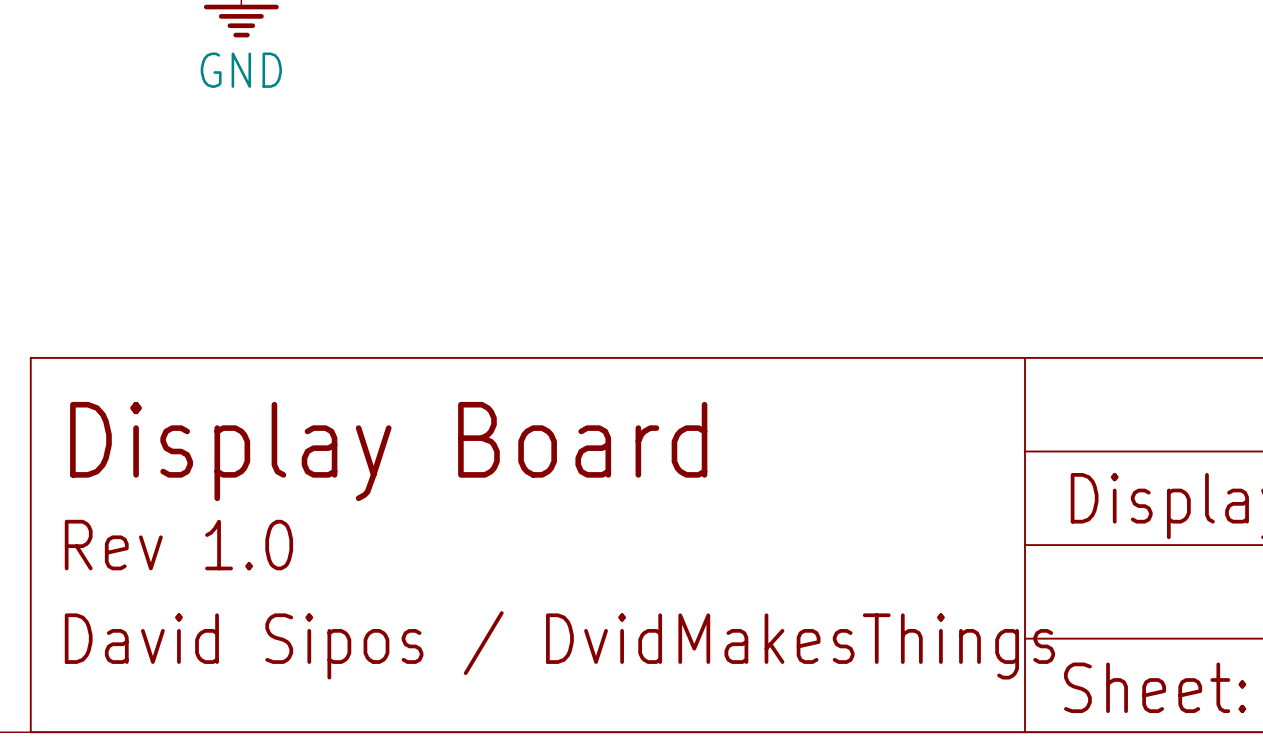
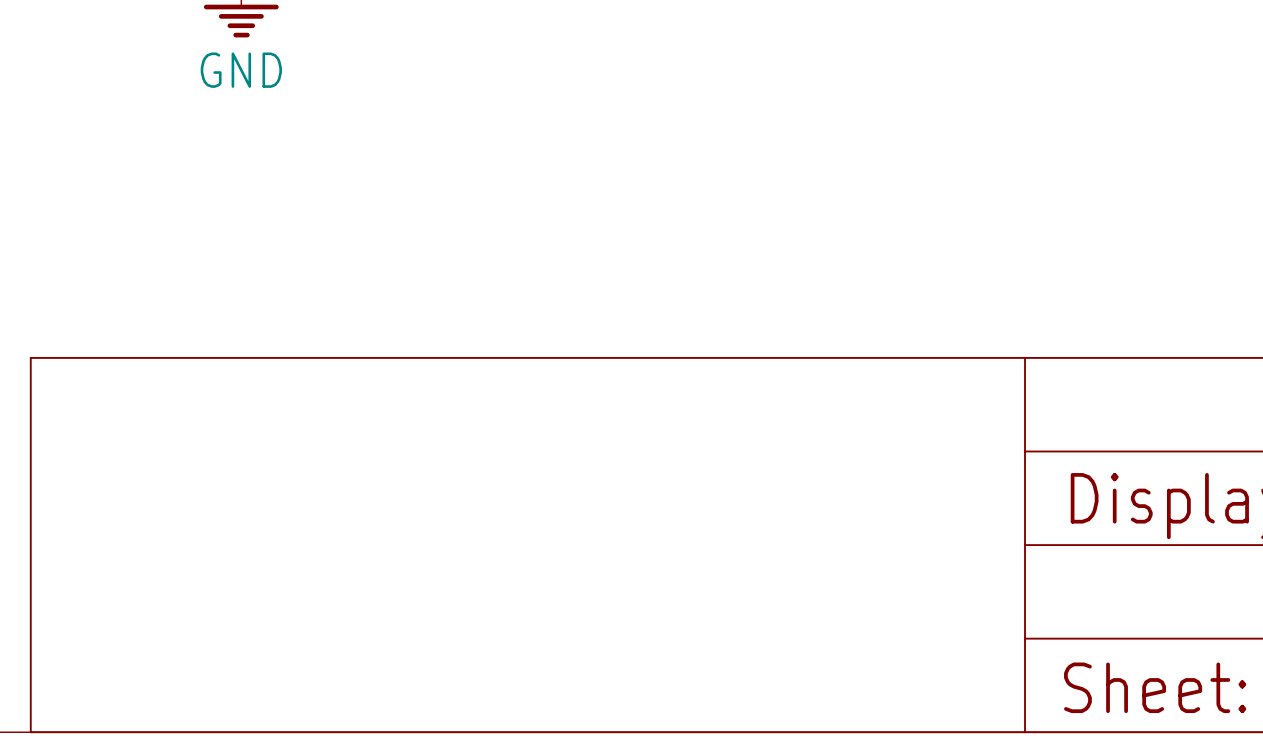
text: Display Board (388, 451) -> none
text: Rev 1.0 (178, 545) -> none
text: David Sipos / DvidMakesThings (559, 645) -> none

